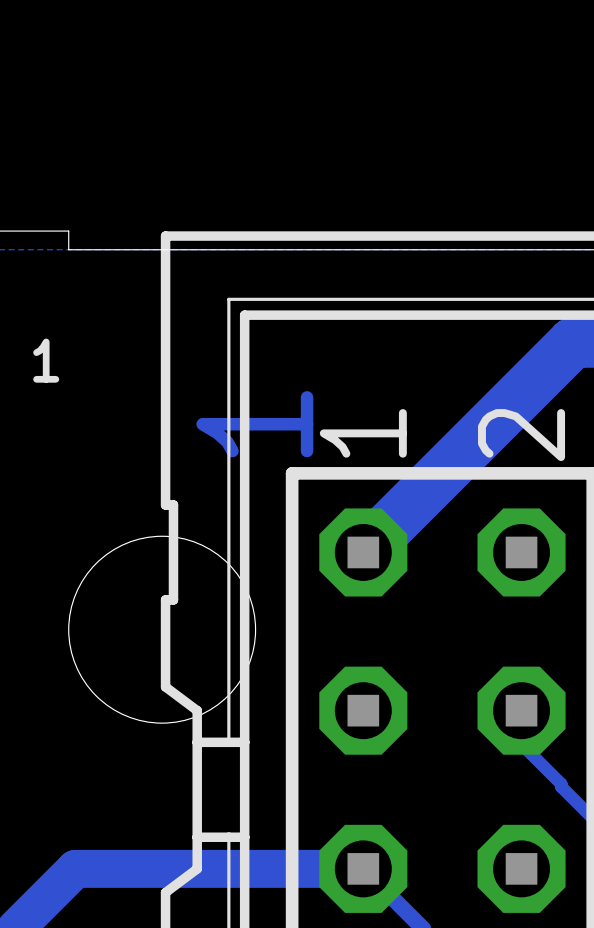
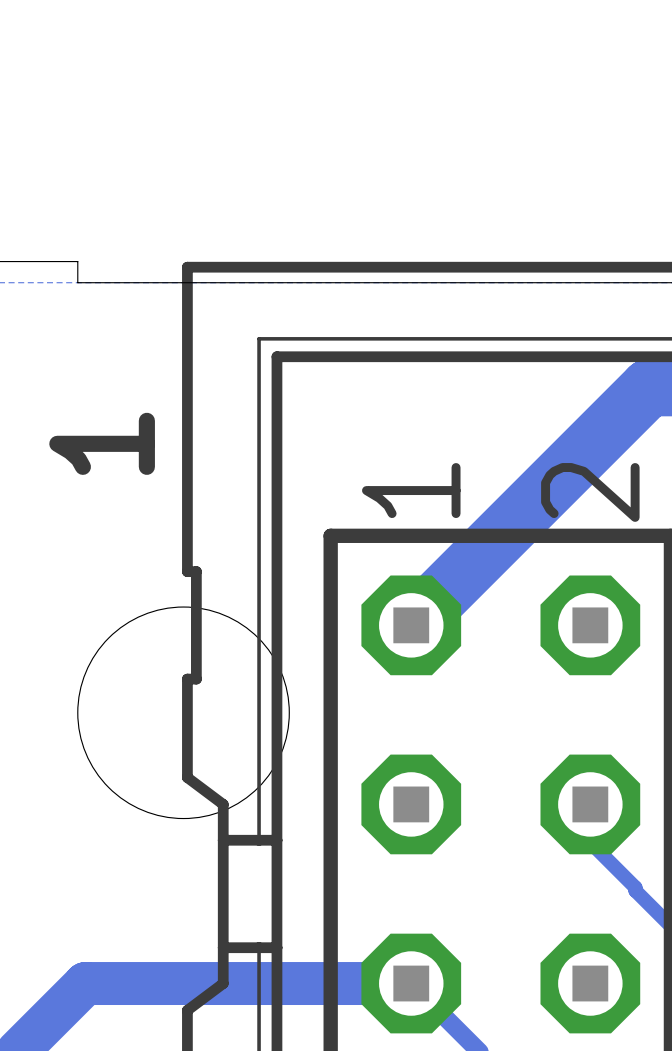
text: 1 (46, 360) -> none
text: none -> 1 (102, 443)
text: 1 (254, 424) -> none

